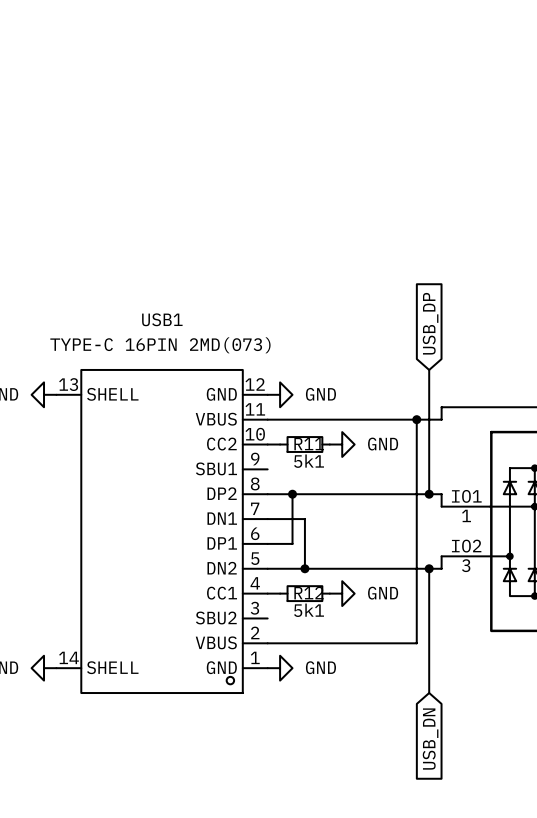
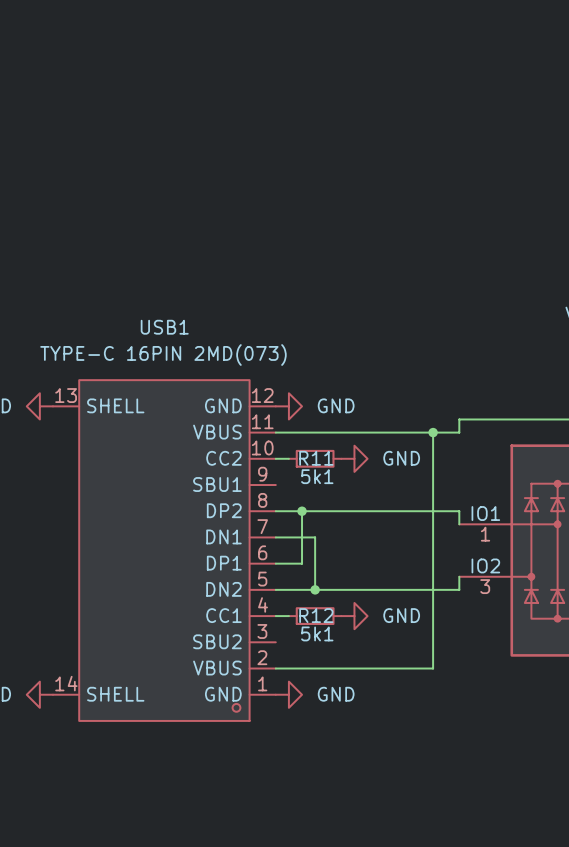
global label: USB_DP (430, 323) -> none
wire: (429, 369) (429, 494) -> none
junction: (429, 494) -> none
wire: (429, 568) (429, 693) -> none
junction: (429, 568) -> none
global label: USB_DN (430, 739) -> none

